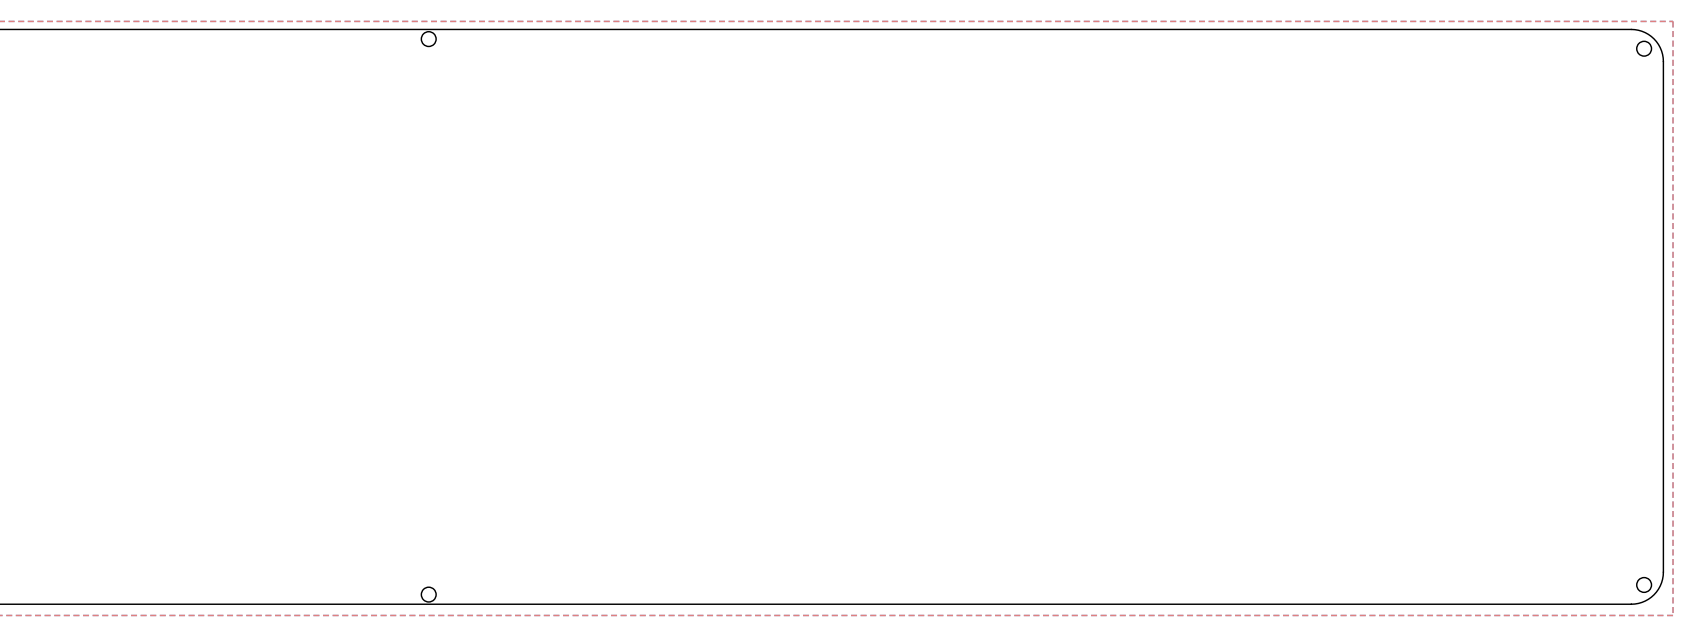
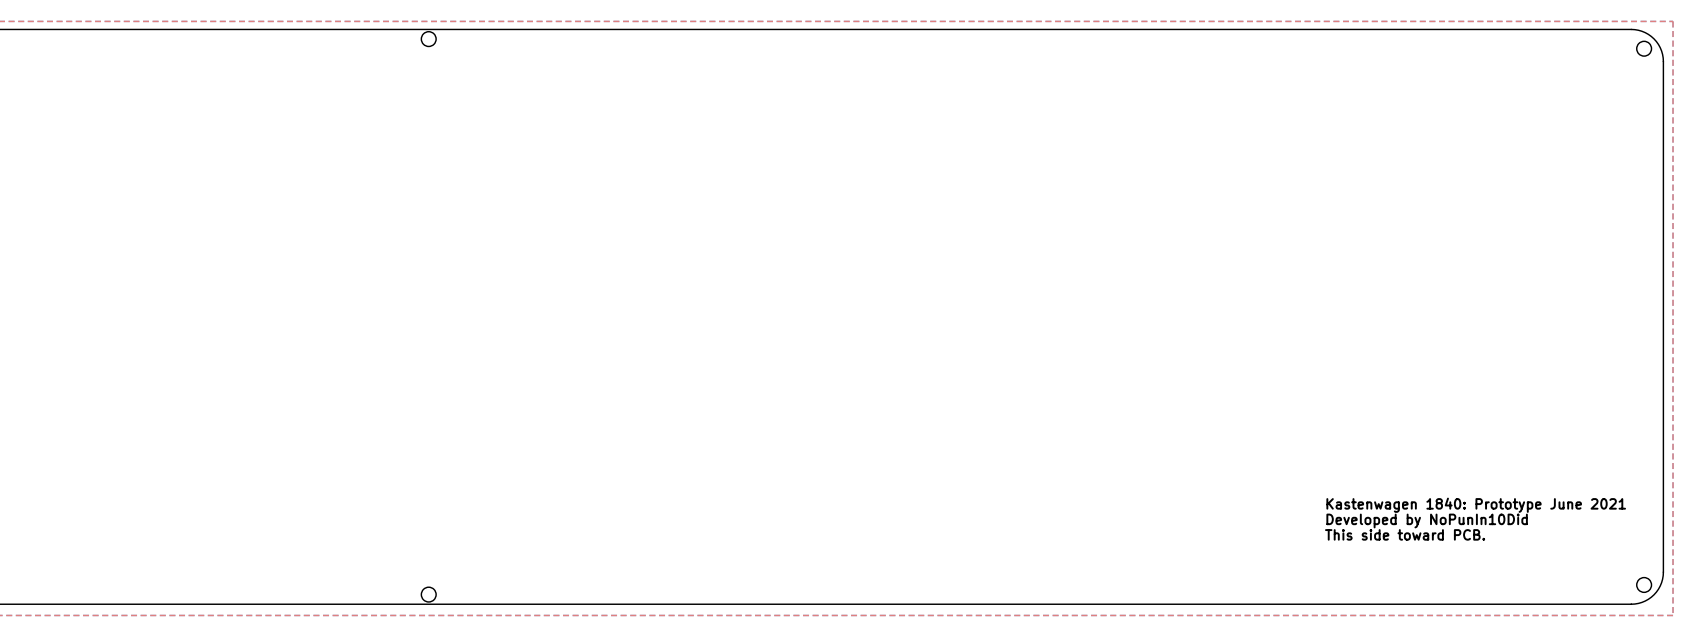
text: none -> Kastenwagen 1840: Prototype June 2021 (1476, 505)
text: none -> Developed by NoPunIn10Did (1427, 520)
text: none -> This side toward PCB. (1405, 534)

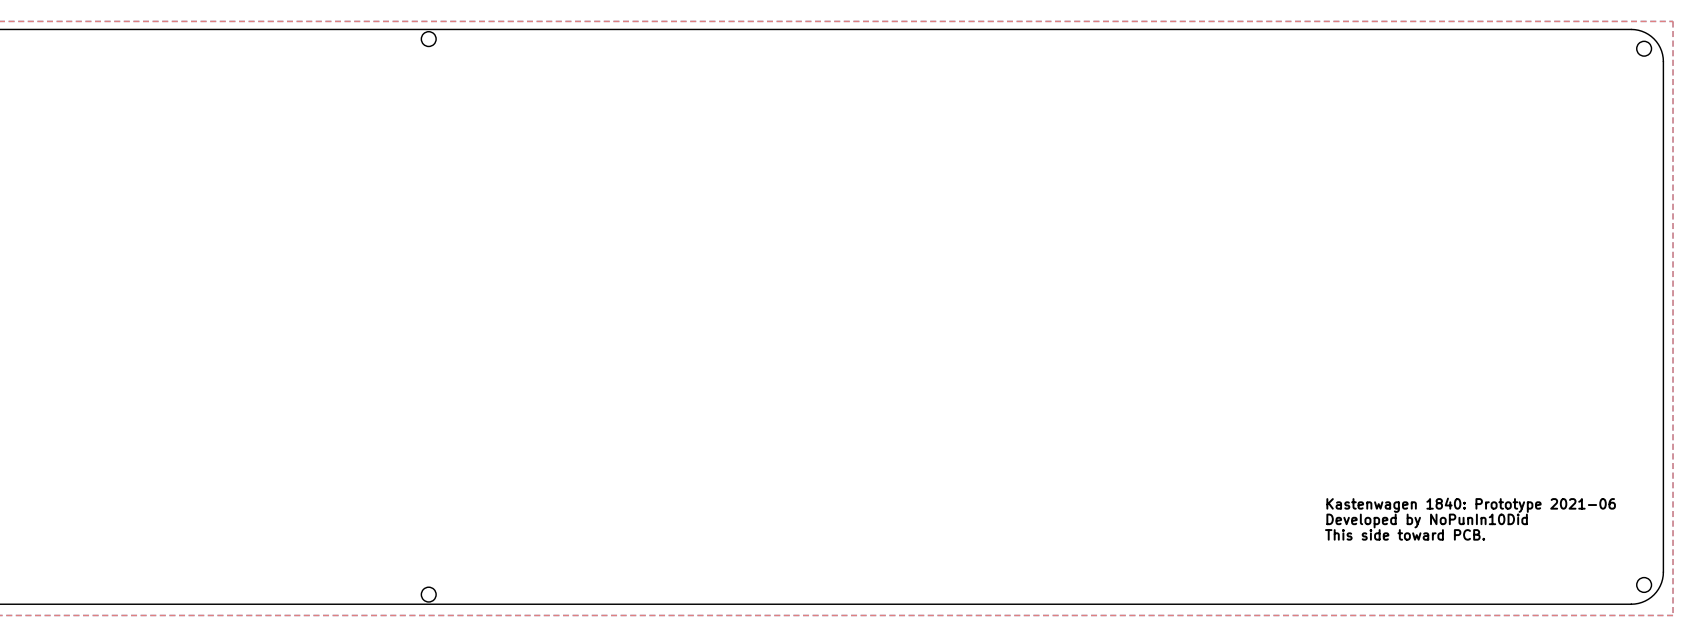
text: Kastenwagen 1840: Prototype June 2021 (1476, 505) -> Kastenwagen 1840: Prototype 2021-06 (1471, 505)

